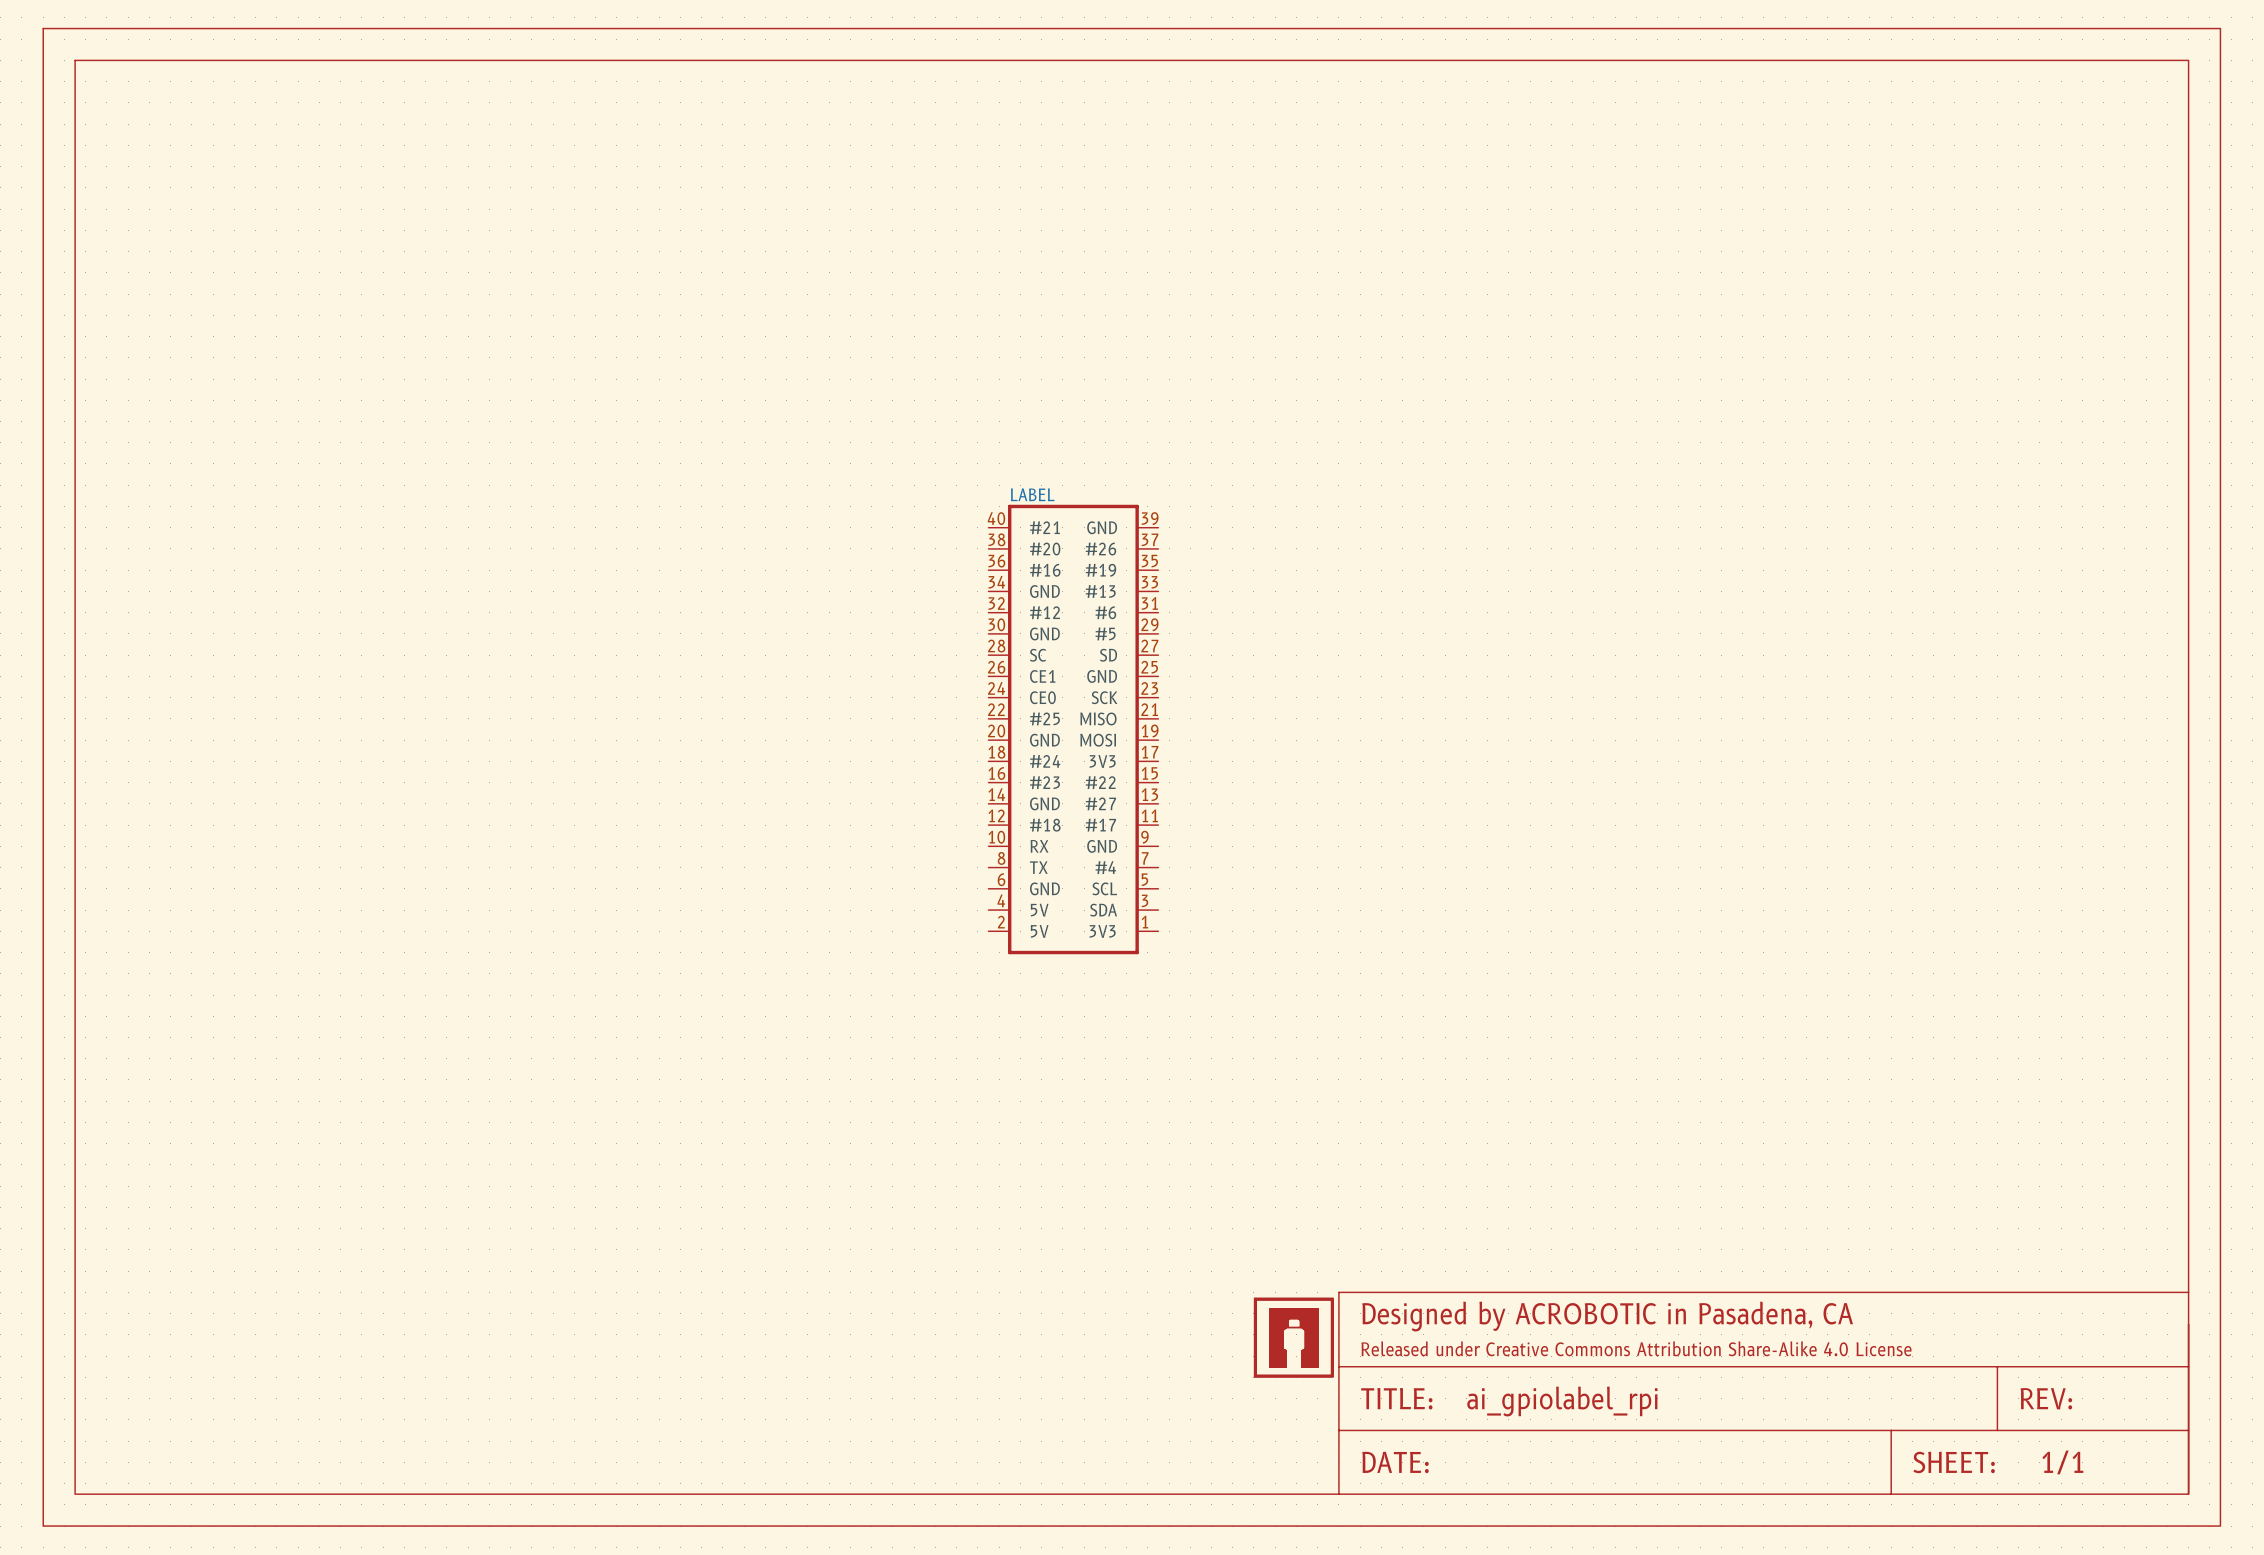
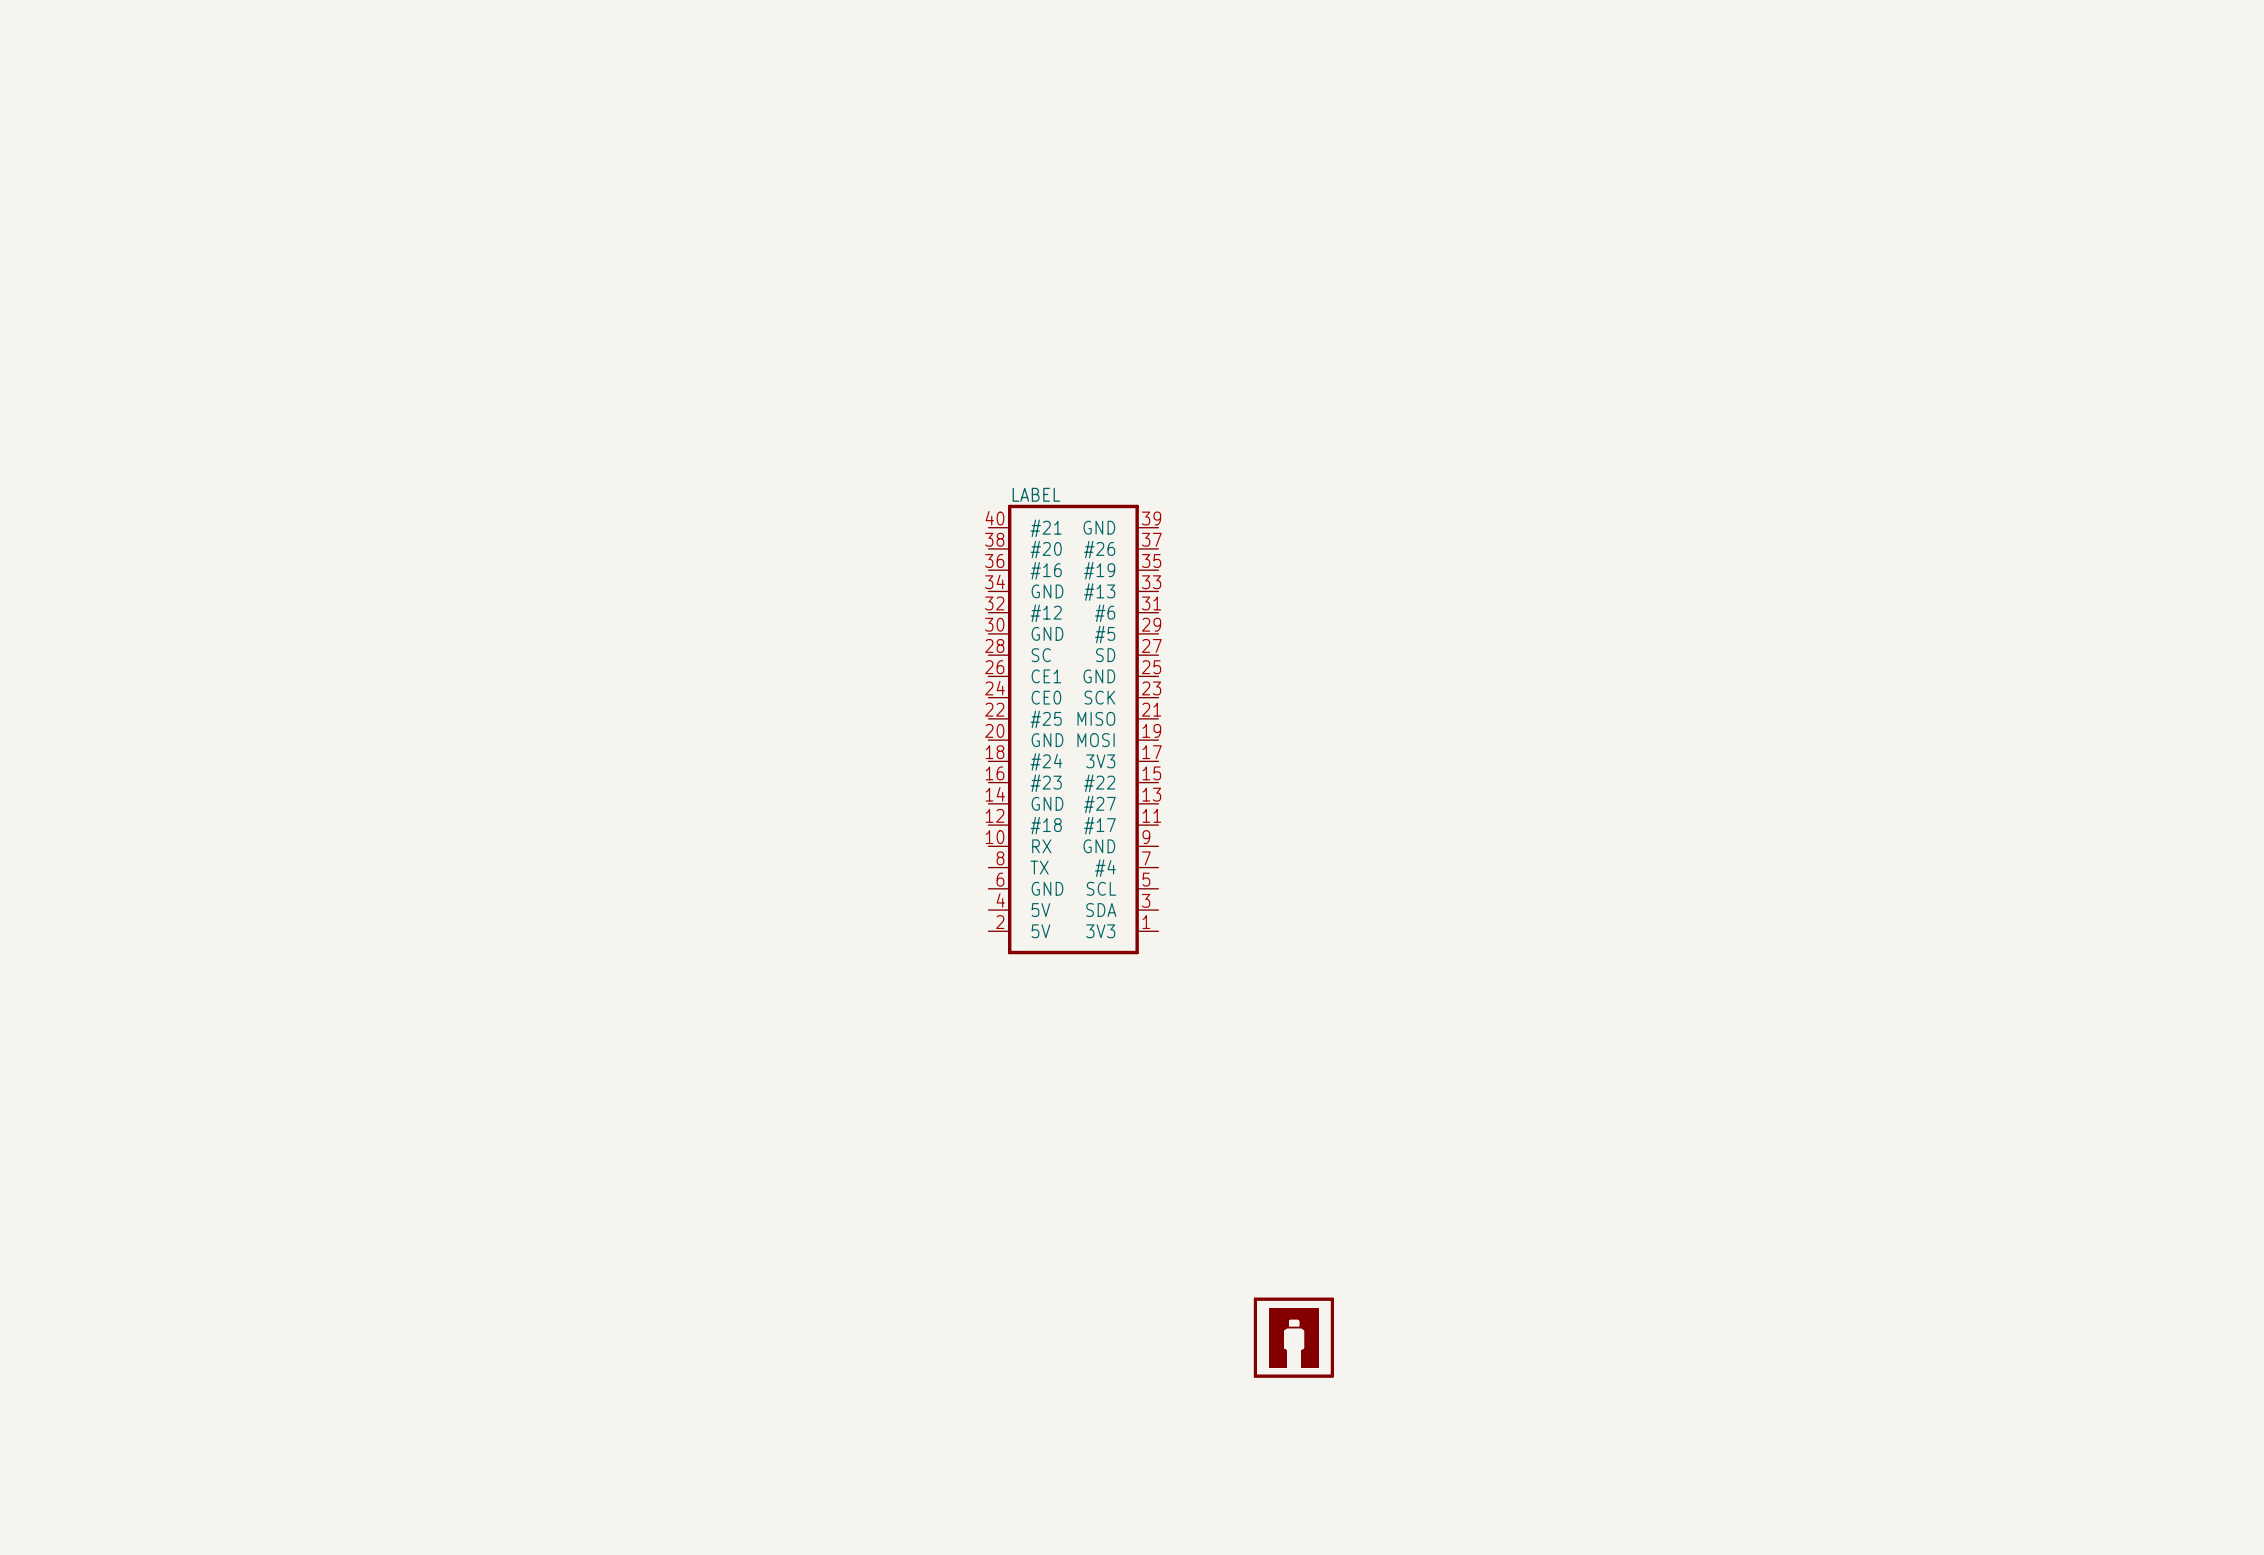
part: (1131, 777) -> none
part: (1763, 1393) -> none

